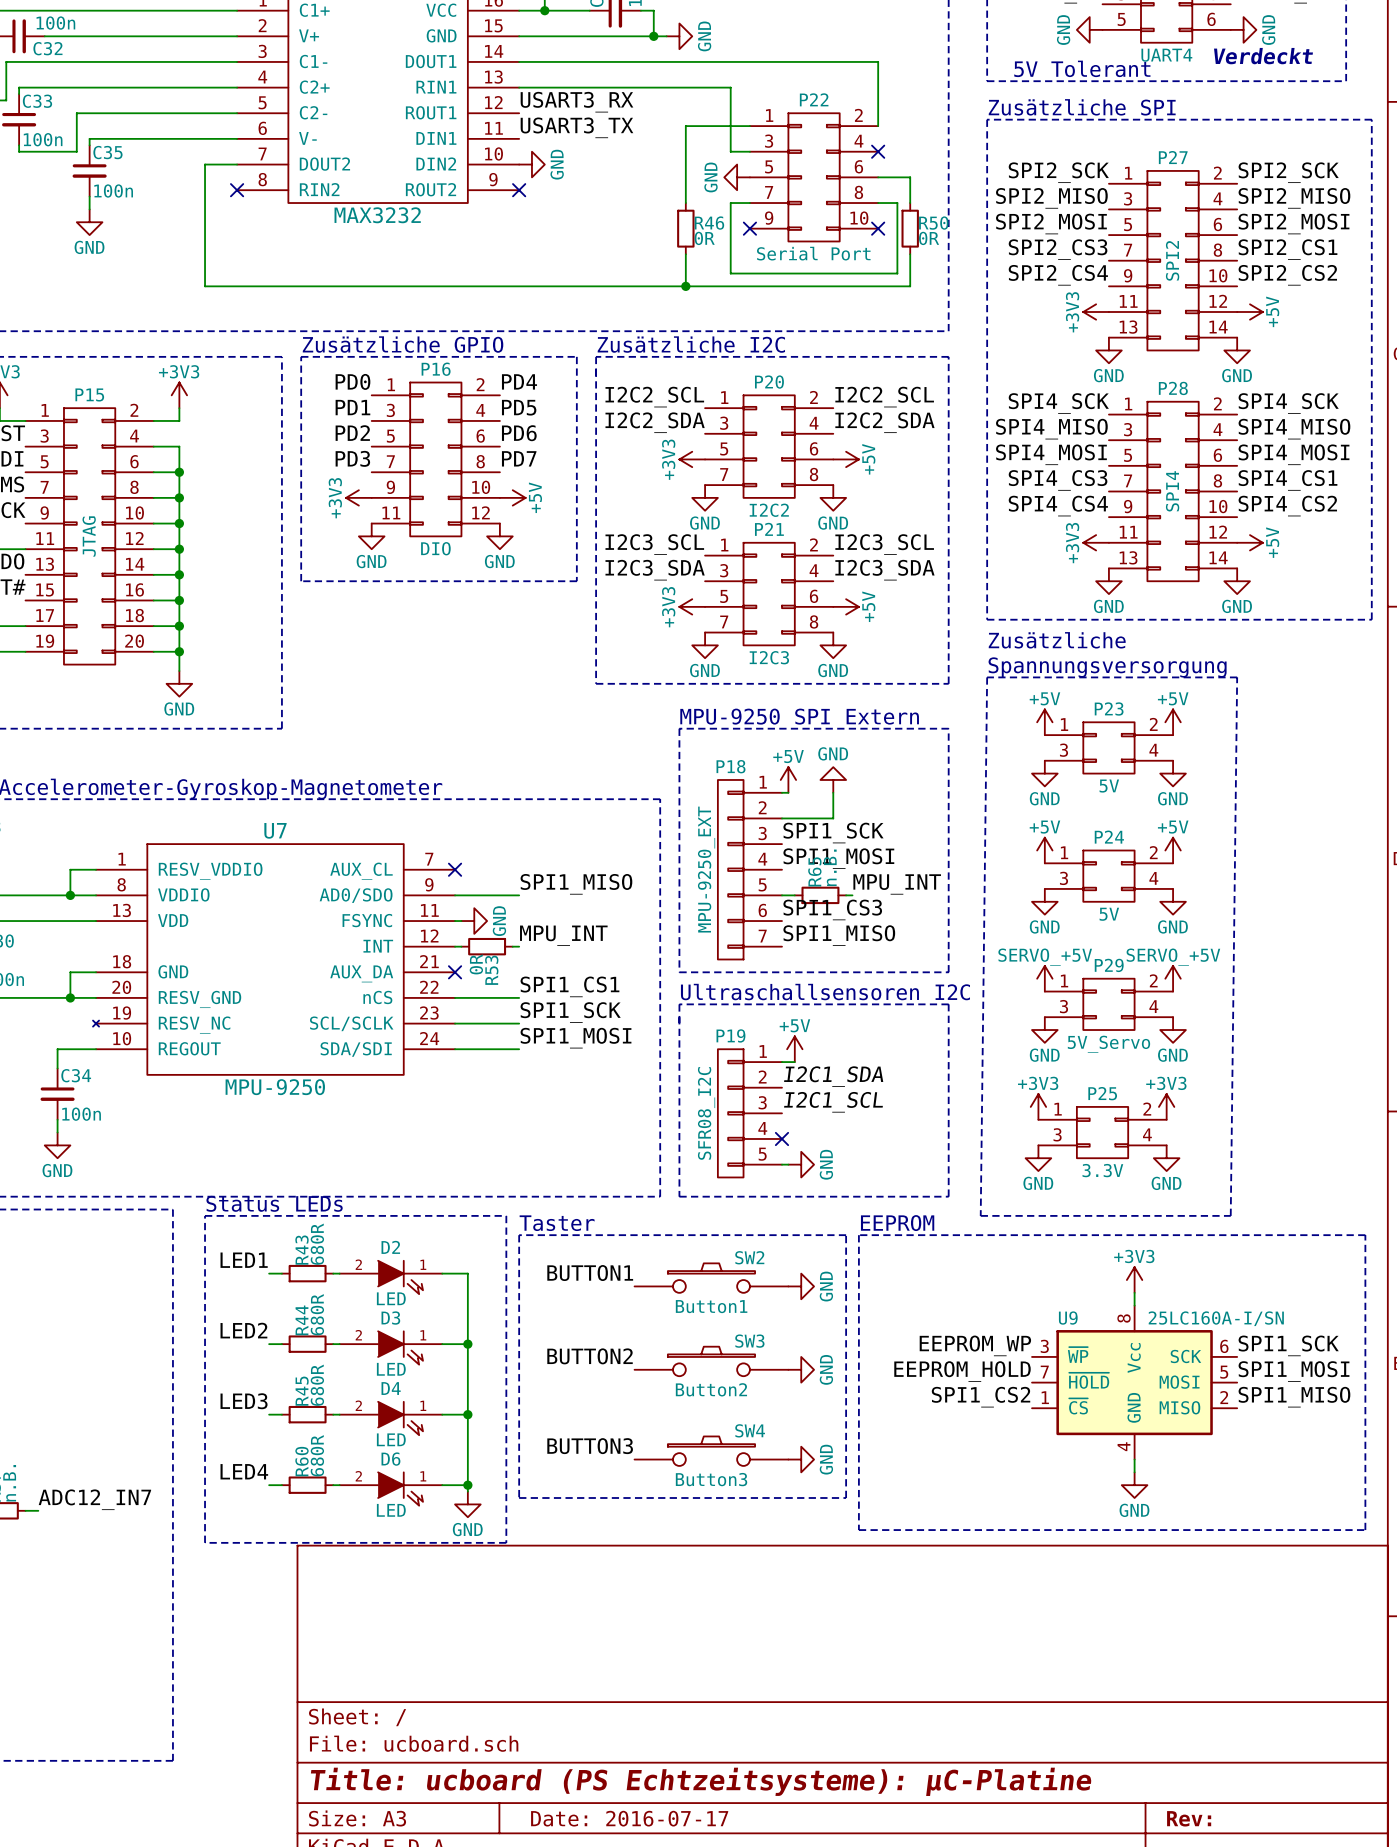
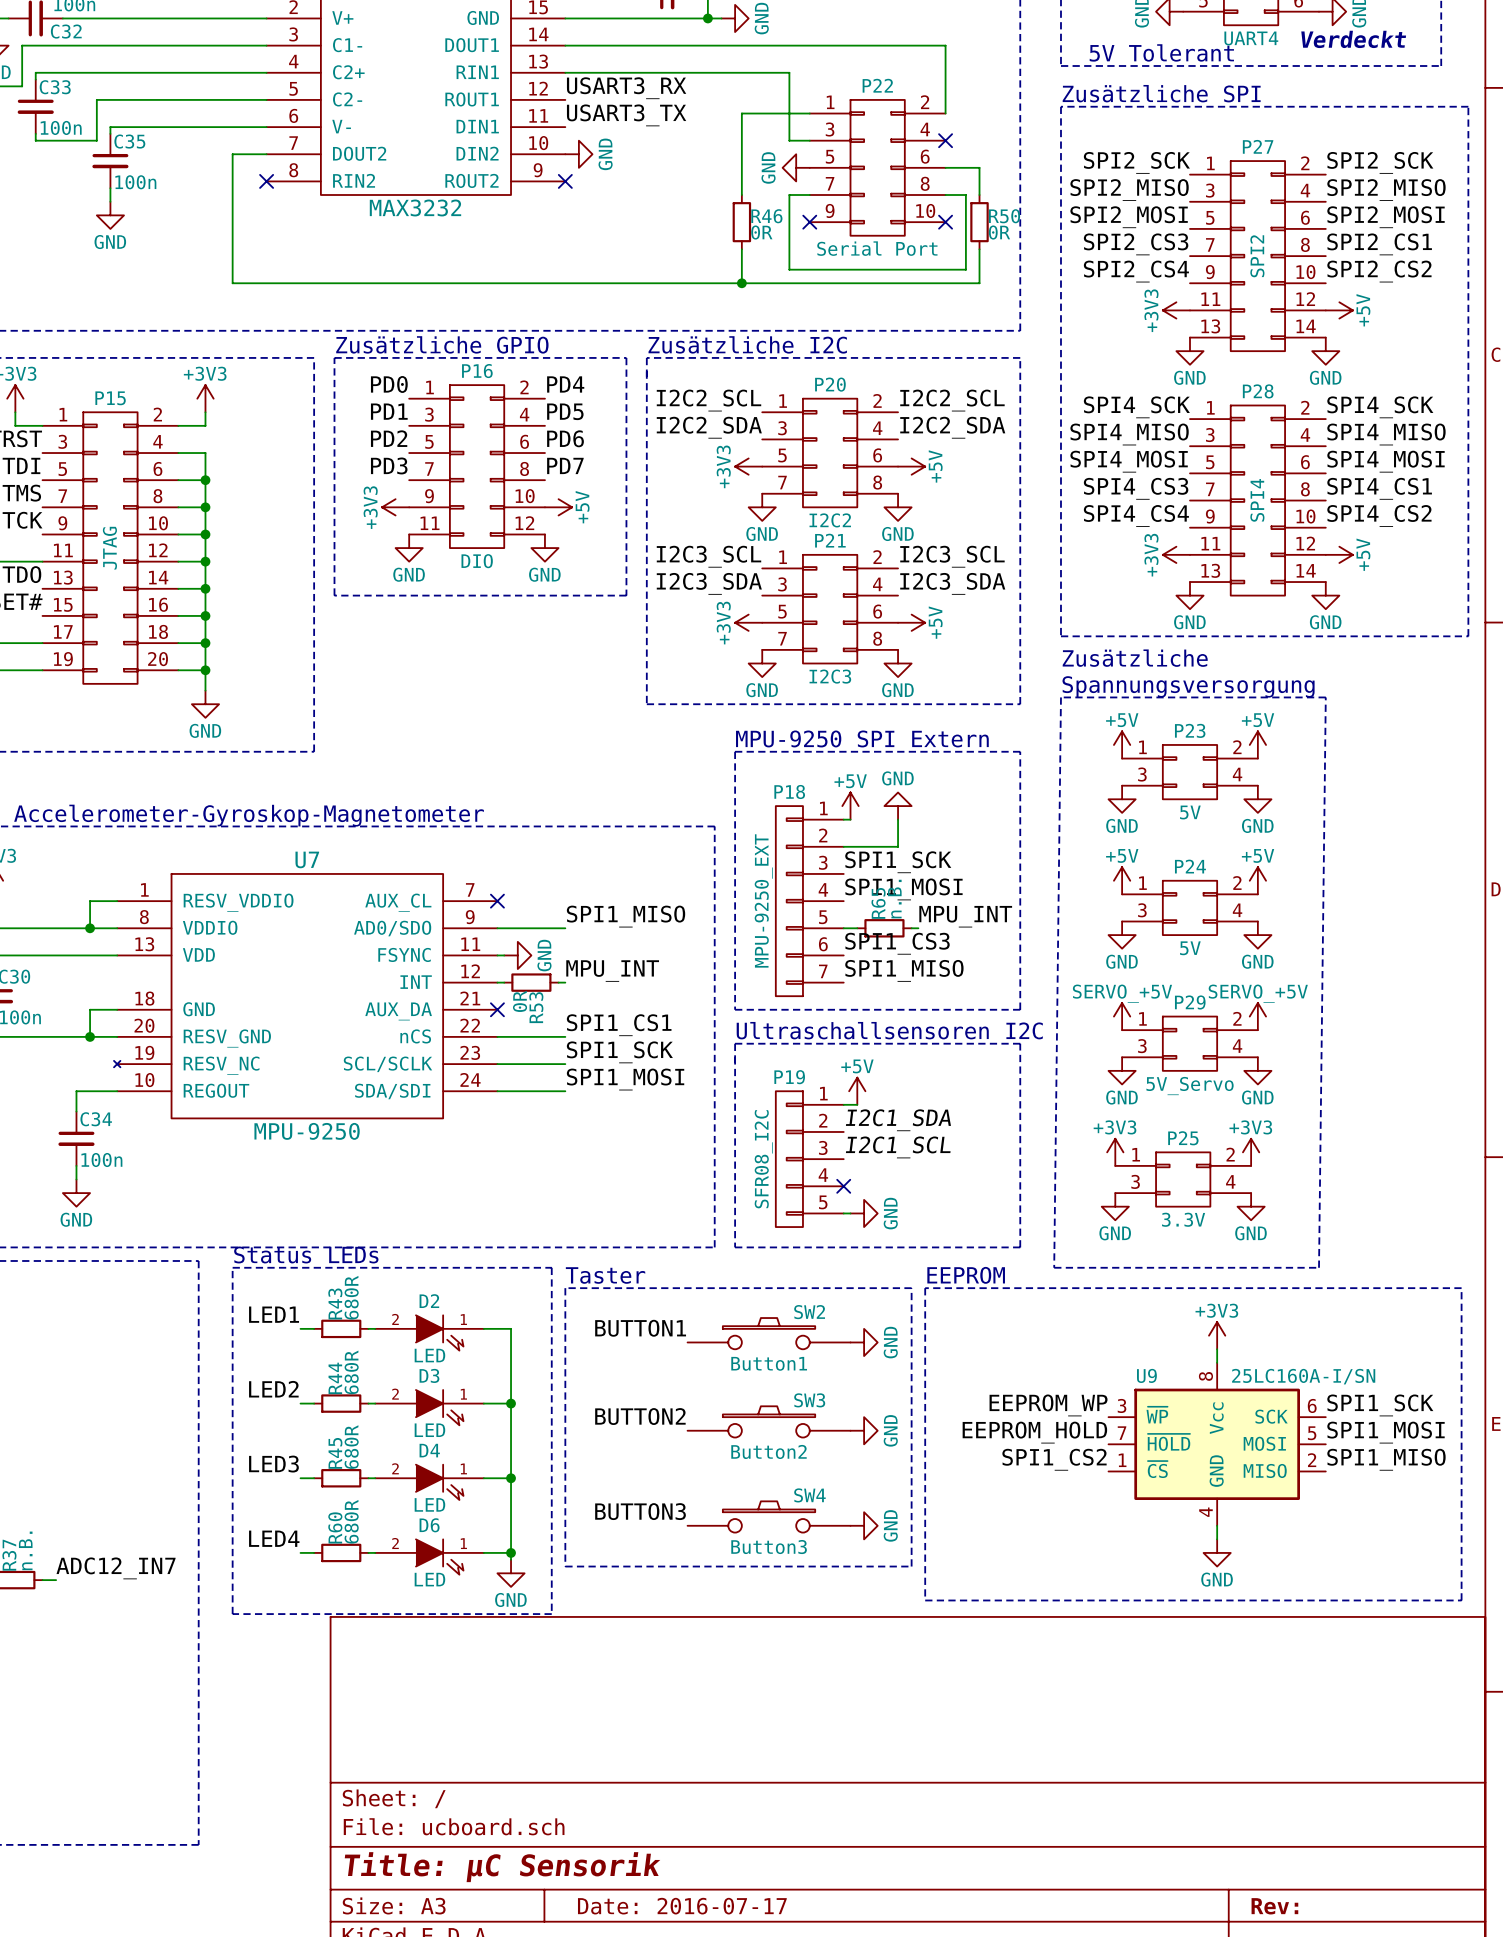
title block: Title: ucboard (PS Echtzeitsysteme): µC-Platine (701, 1781) -> Title: µC Sensorik (502, 1867)

